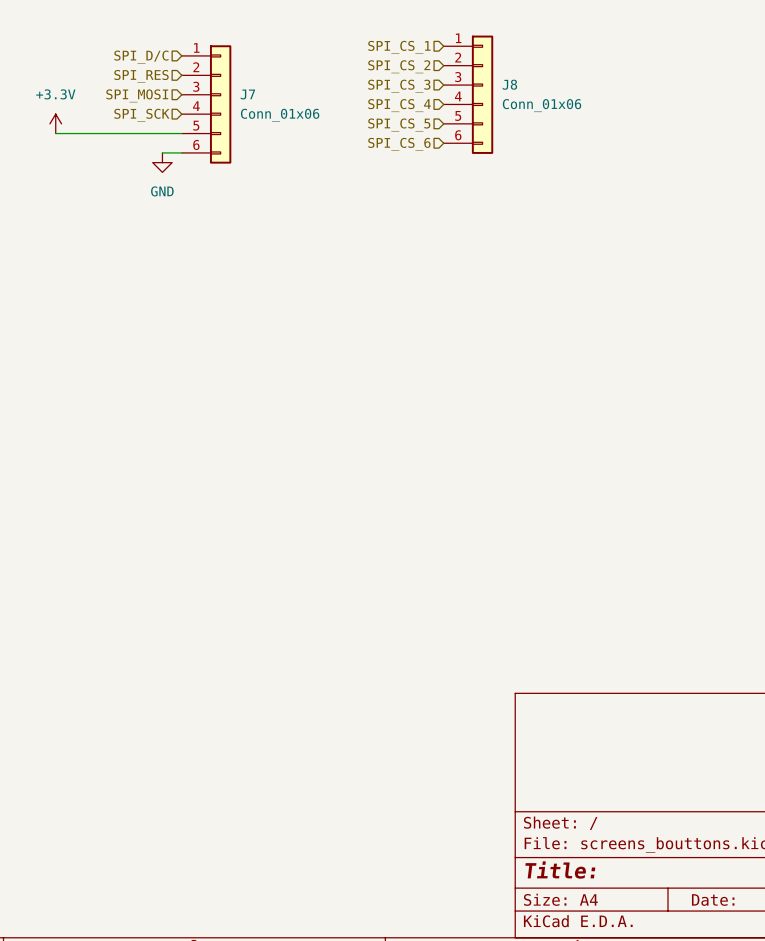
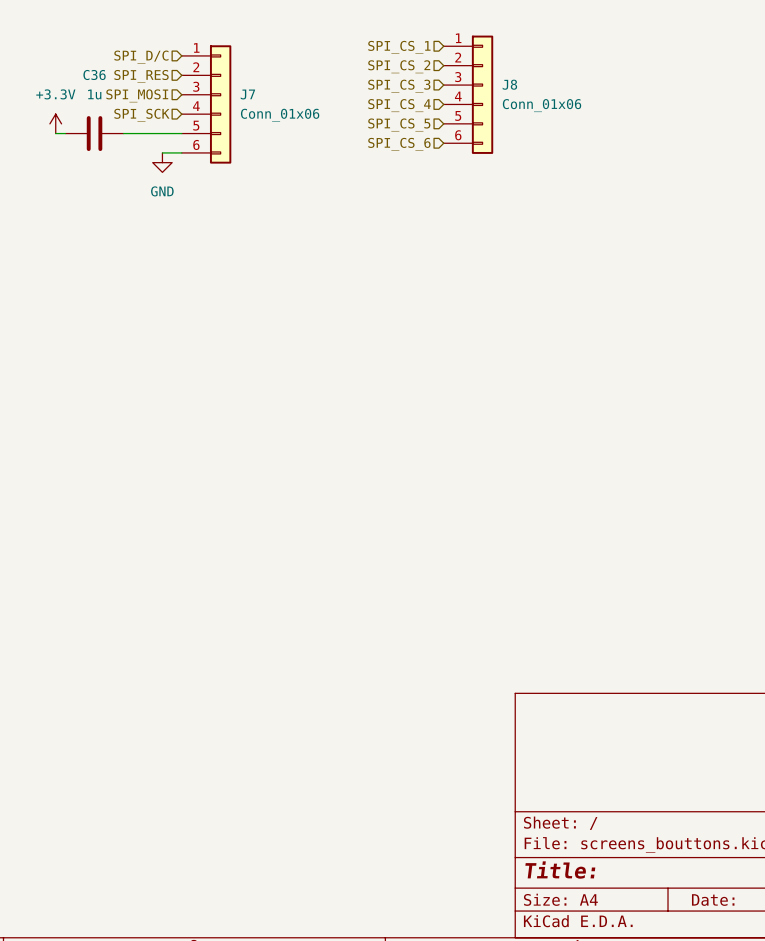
C36: none -> 1u (94, 133)

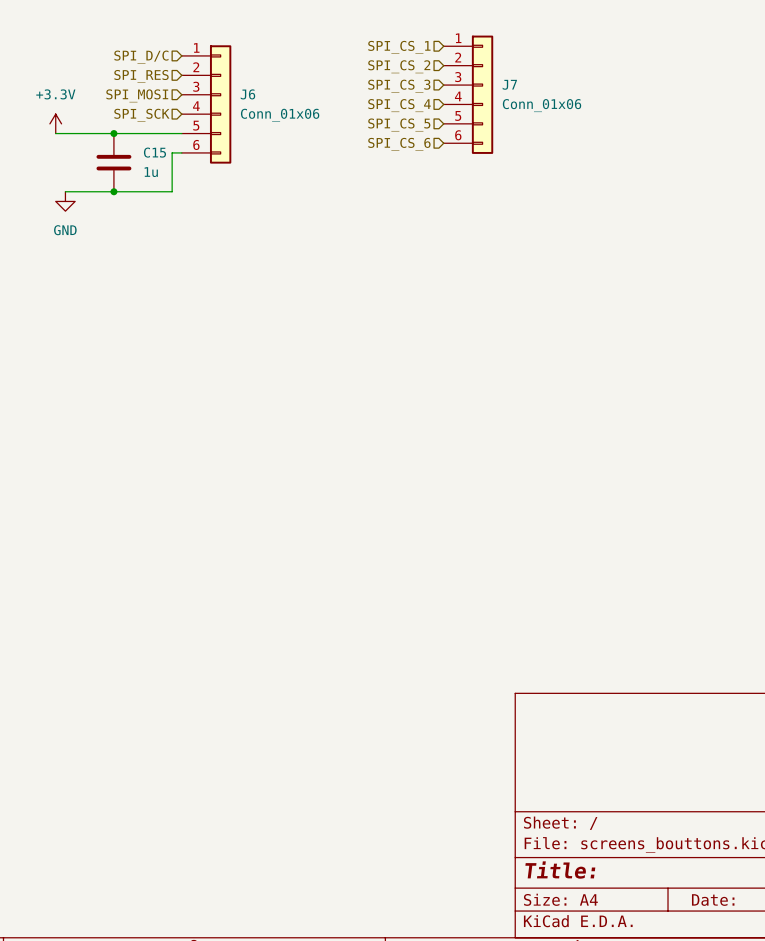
J8 name: J8 (509, 84) -> J7 (509, 84)
J7 name: J7 (247, 94) -> J6 (247, 94)
C36: 1u (94, 133) -> none
junction: none -> (113, 133)
wire: (162, 152) (172, 152) -> (65, 191) (172, 191) (172, 152)
C15: none -> 1u (113, 162)
power symbol position: GND (162, 162) -> GND (65, 201)
junction: none -> (113, 191)

